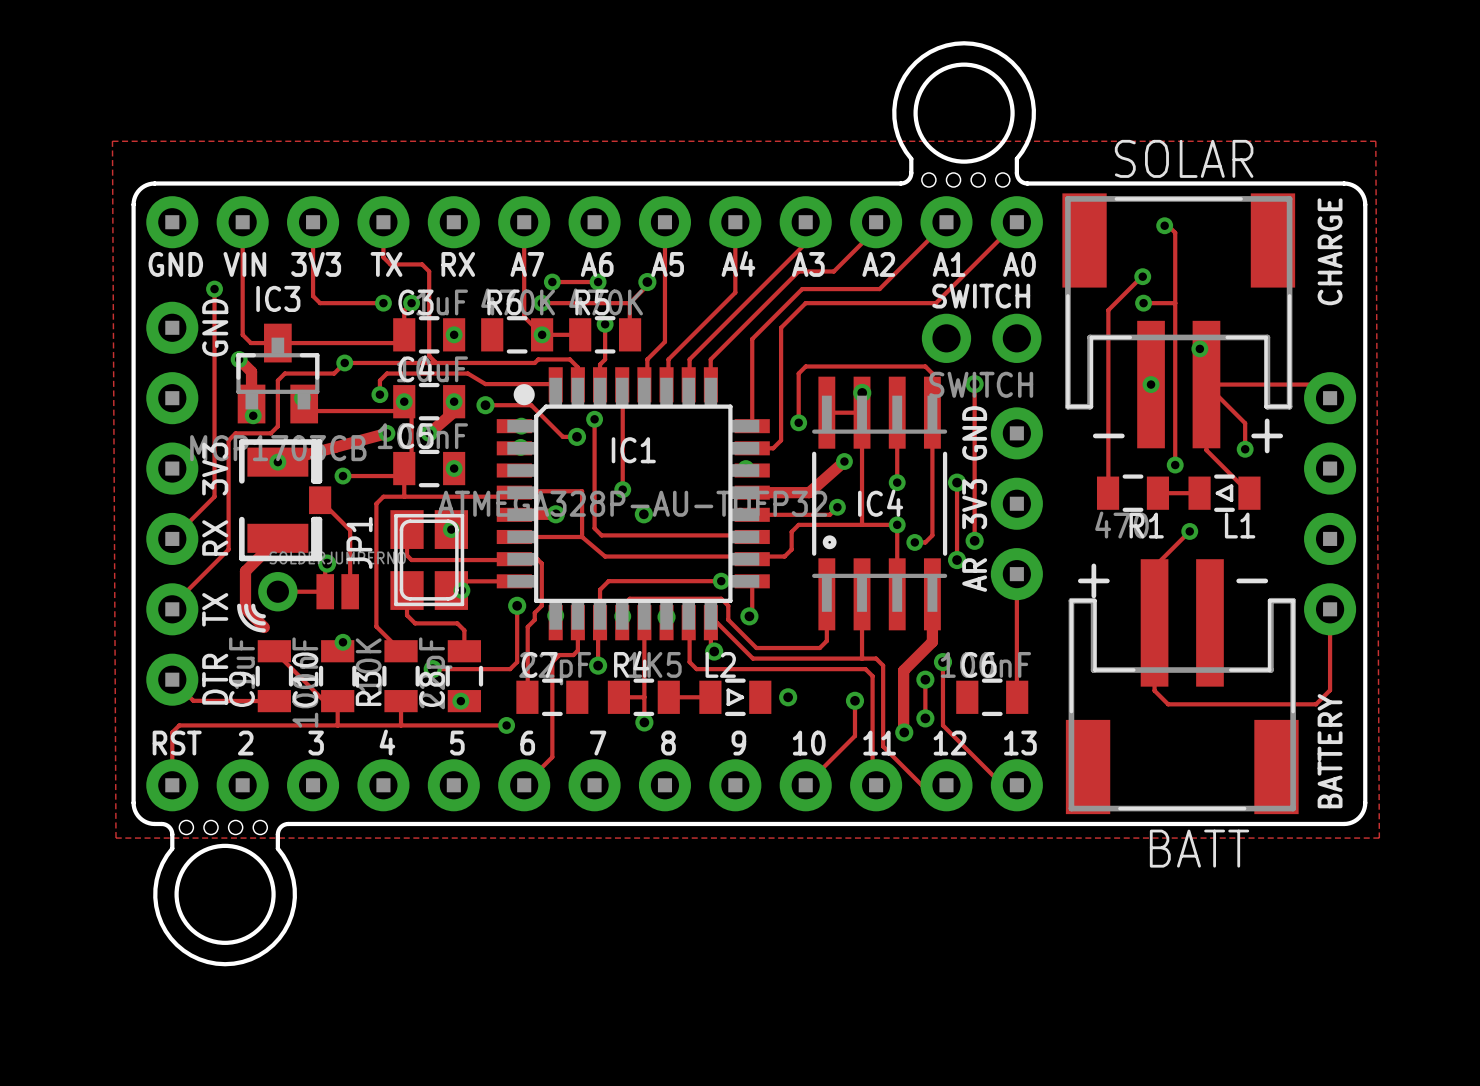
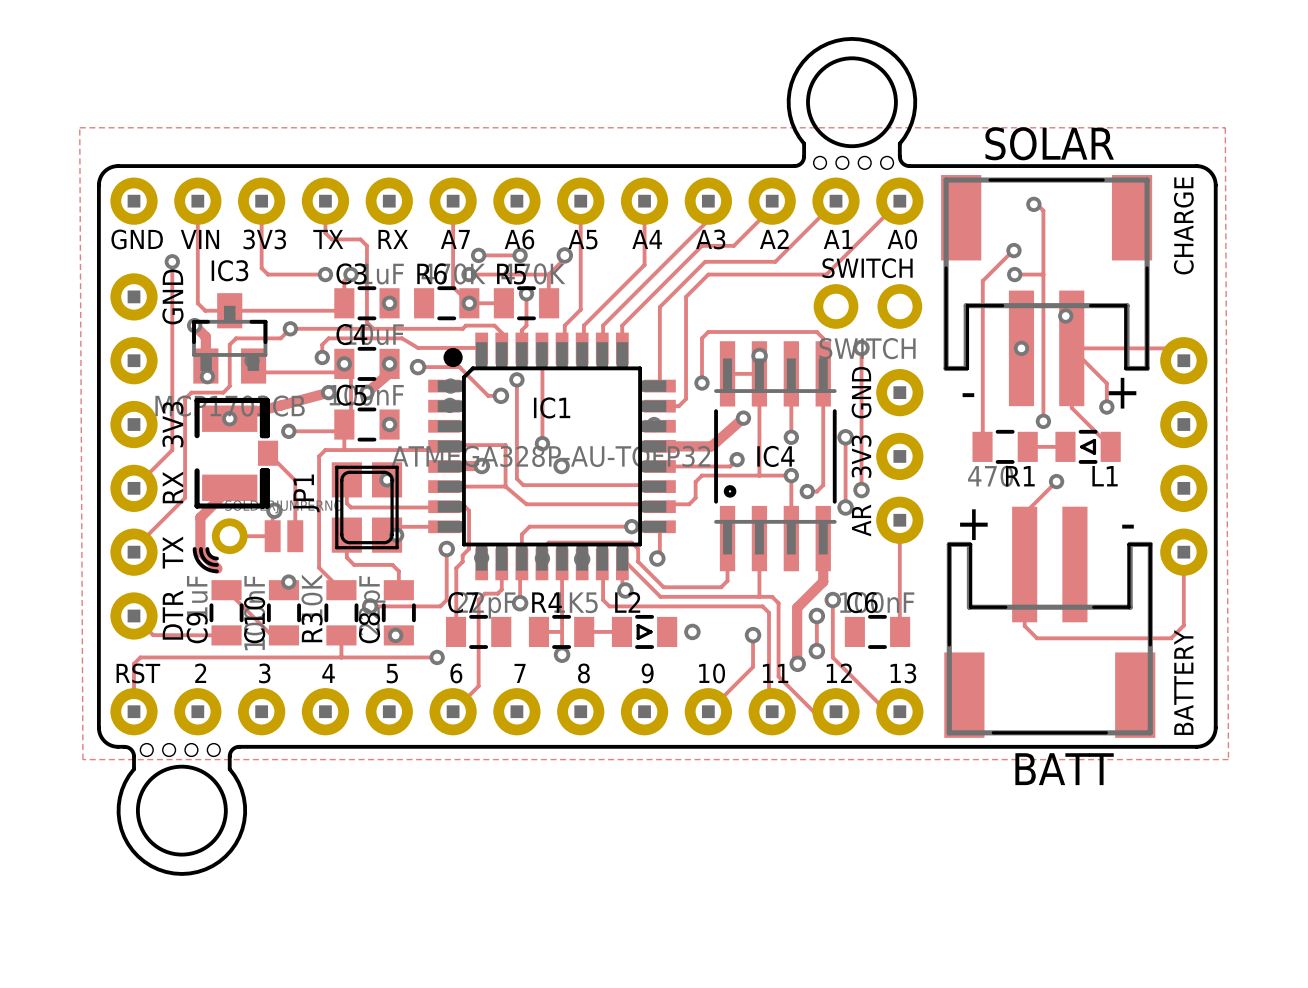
track: (337, 701) (337, 725) -> none

